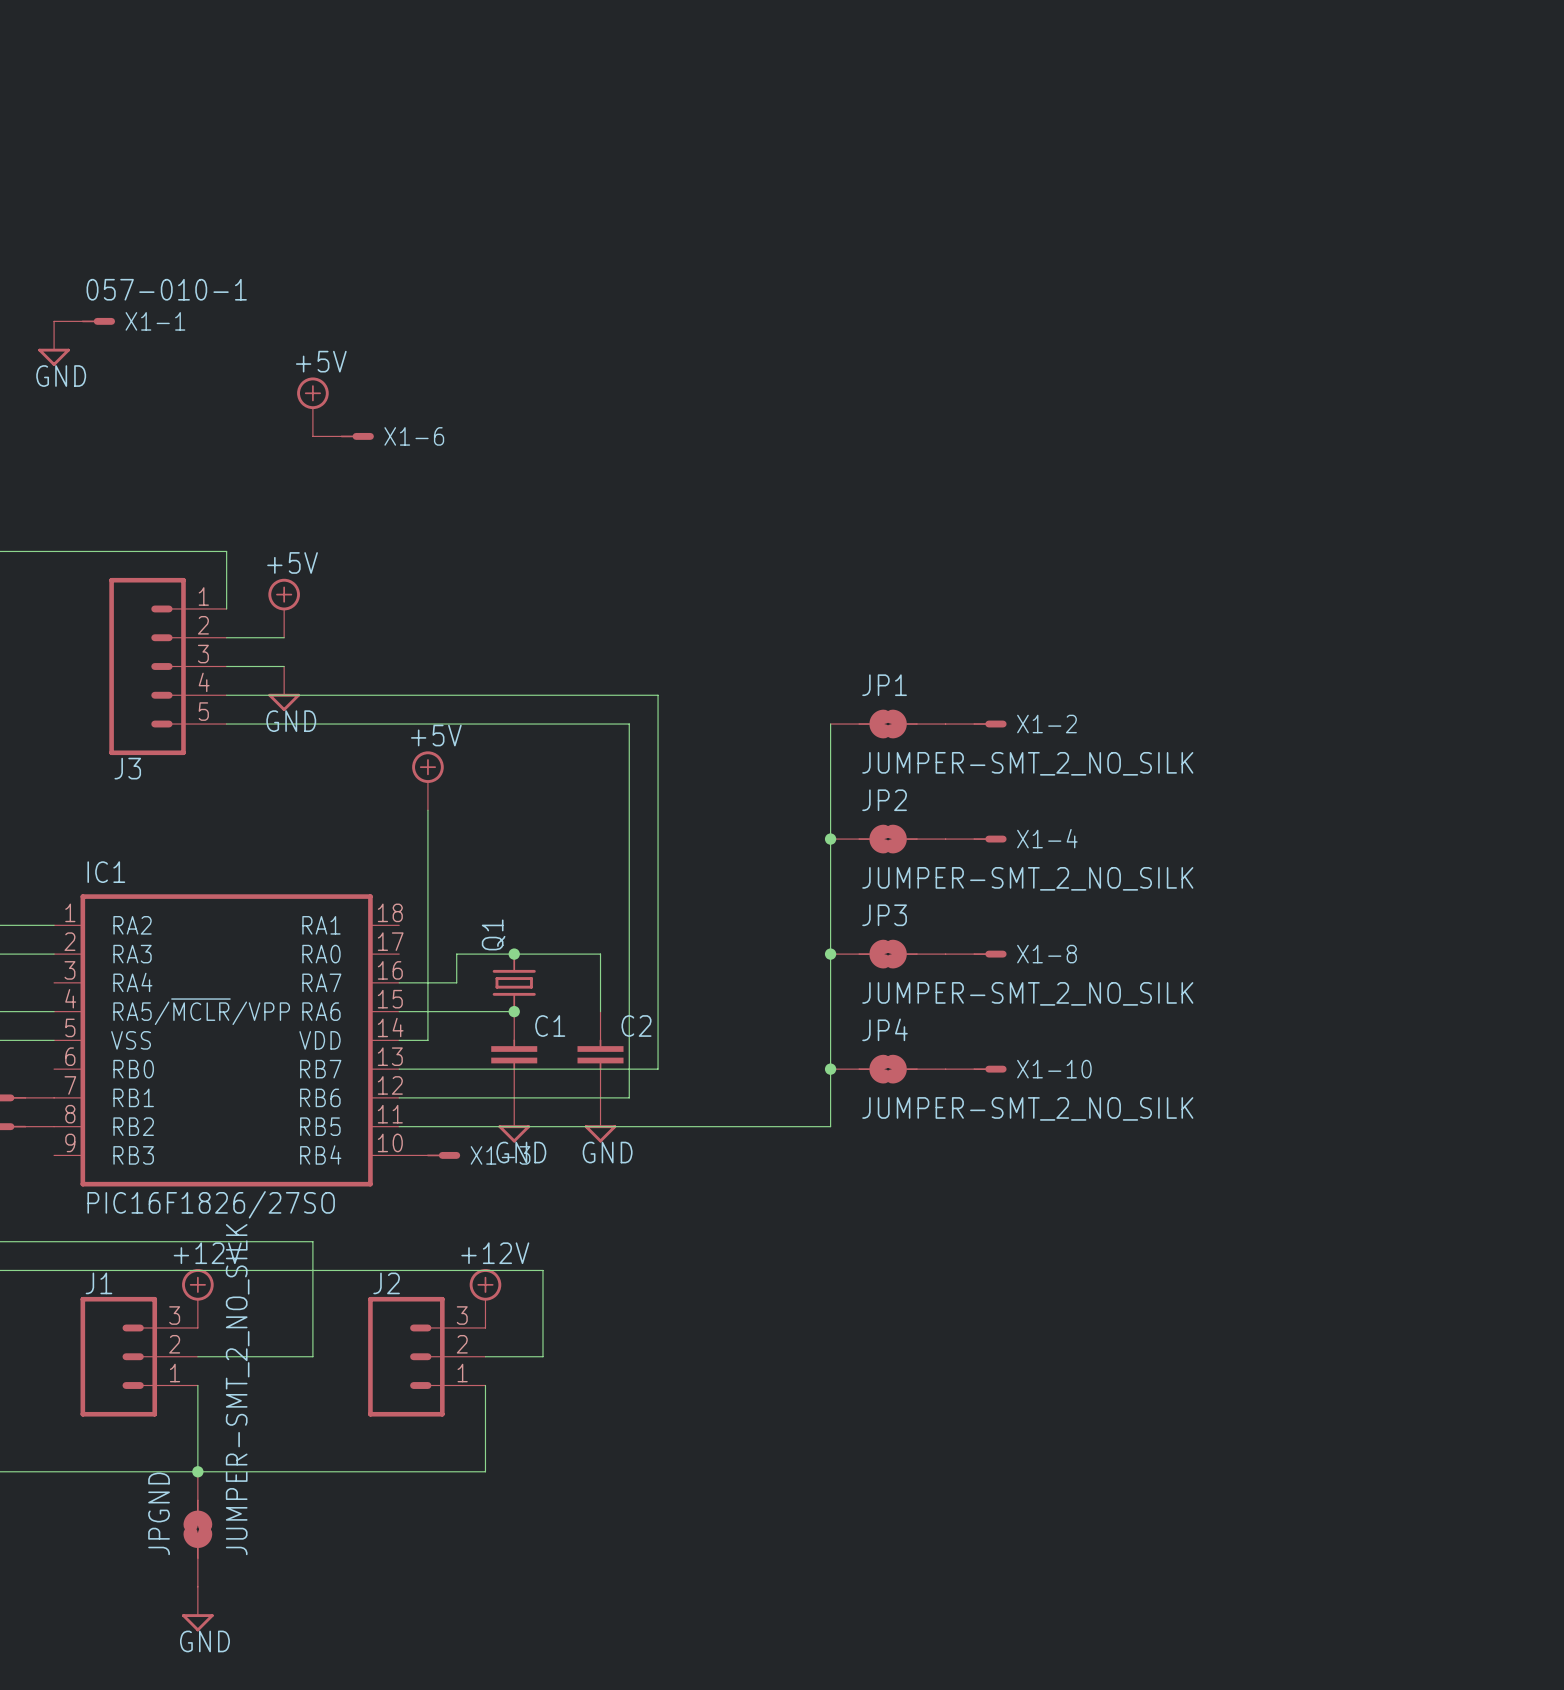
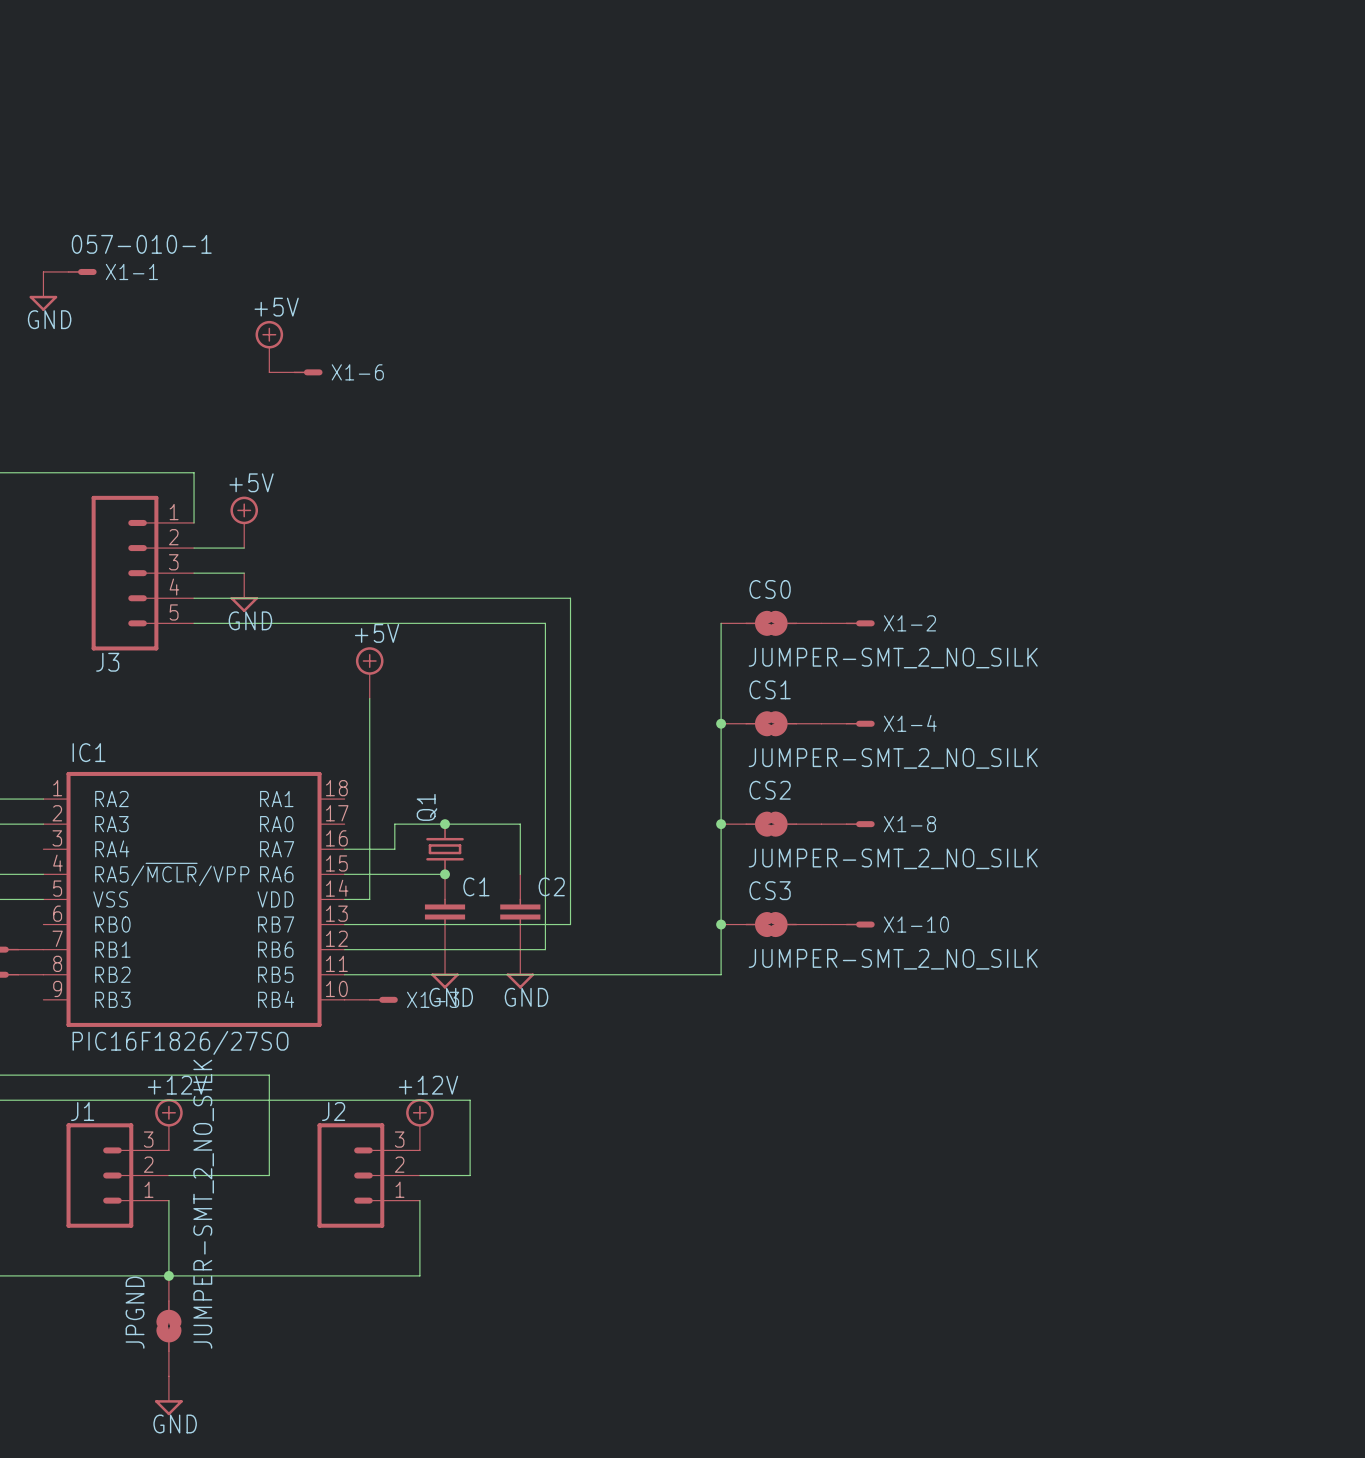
JP1 name: JP1 (884, 685) -> CS0 (770, 589)
JP2 name: JP2 (884, 800) -> CS1 (770, 689)
JP3 name: JP3 (884, 915) -> CS2 (770, 790)
JP4 name: JP4 (885, 1029) -> CS3 (770, 890)

